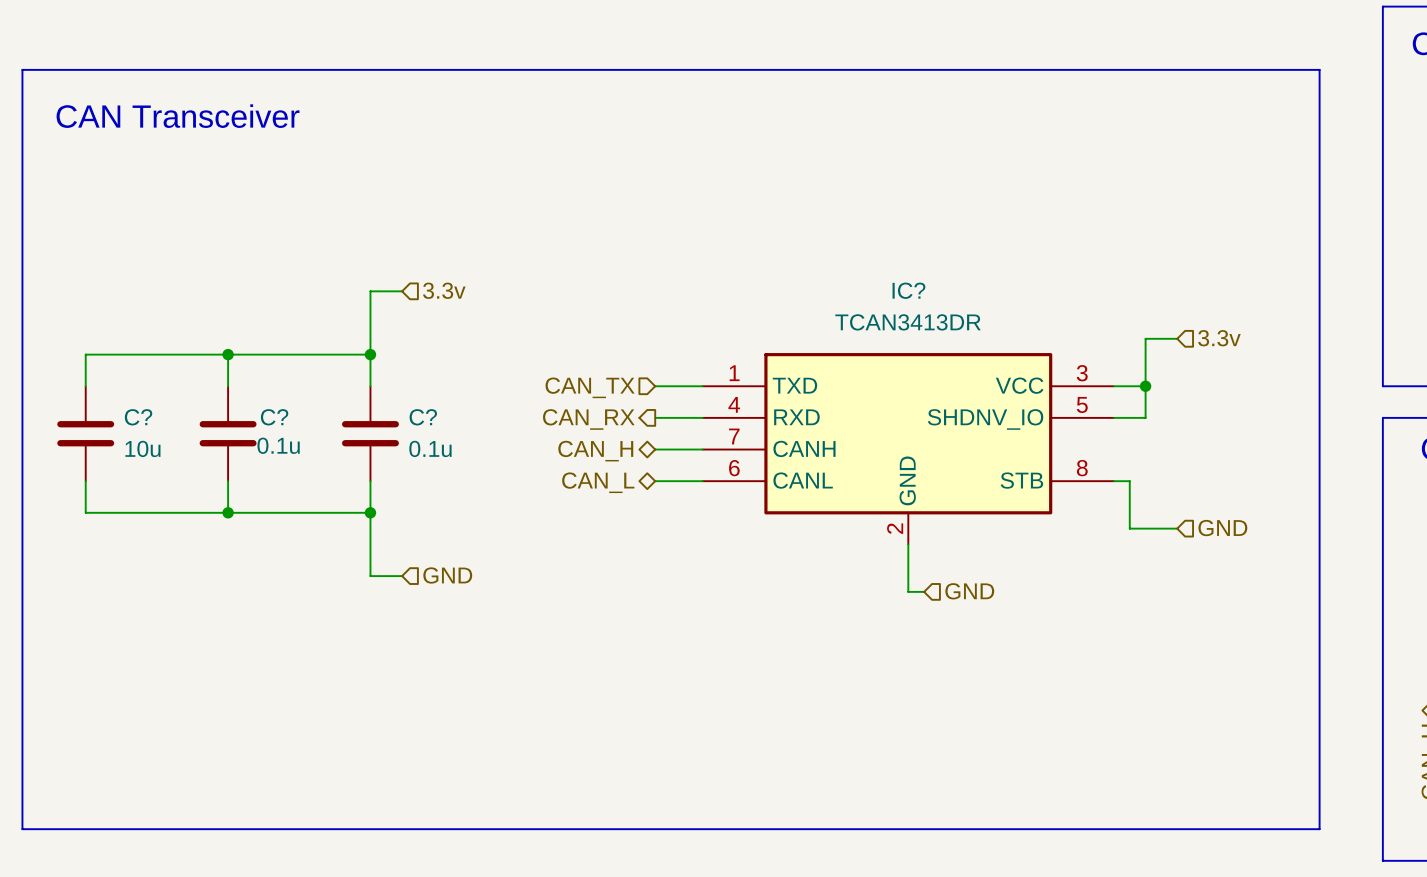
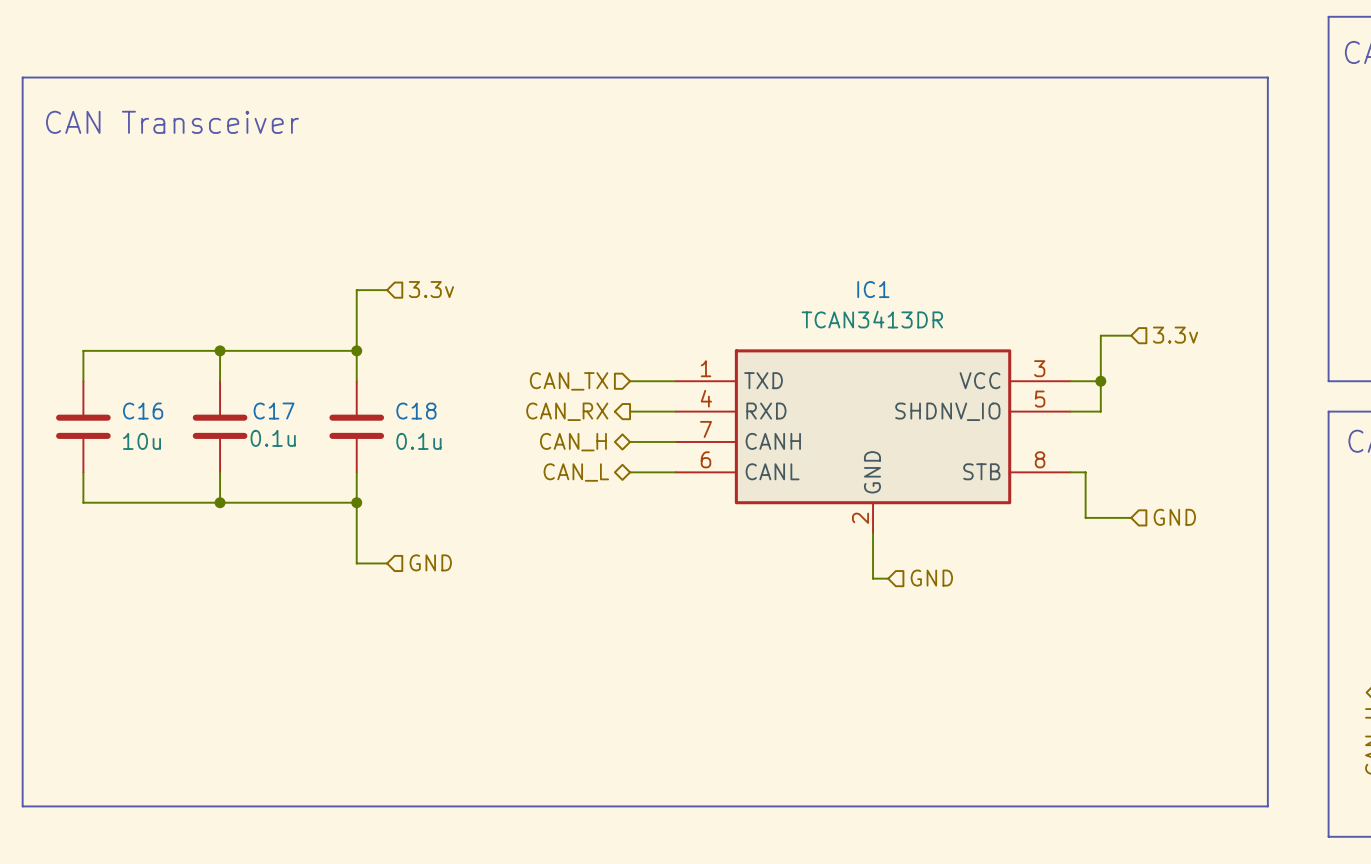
IC? name: IC? (908, 290) -> IC1 (873, 289)
C? name: C? (138, 417) -> C16 (143, 411)
C? name: C? (274, 417) -> C17 (274, 411)
C? name: C? (423, 417) -> C18 (416, 411)

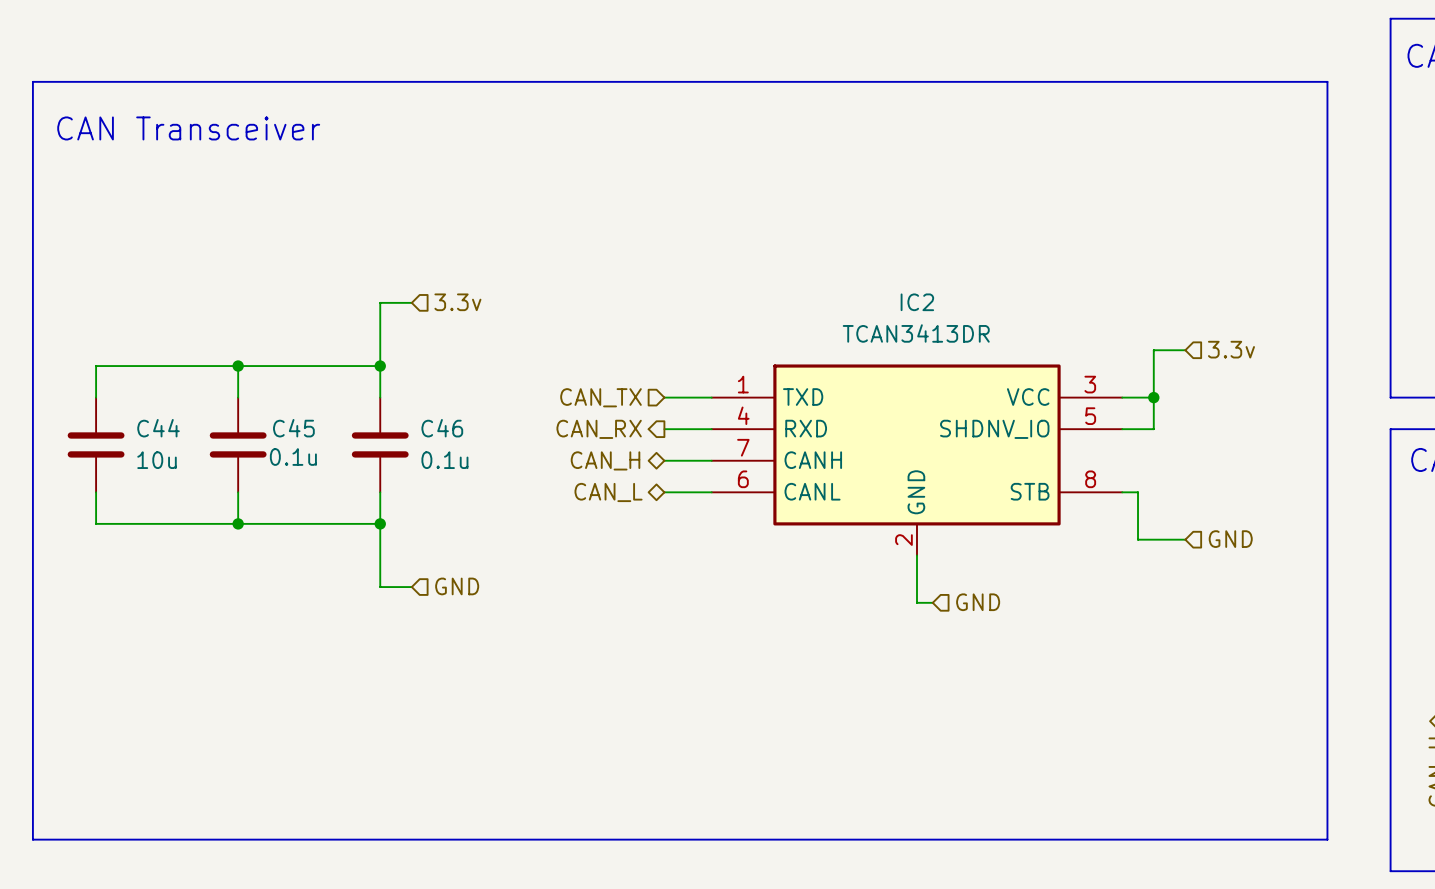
IC1 name: IC1 (873, 289) -> IC2 (917, 302)
C16 name: C16 (143, 411) -> C44 (158, 428)
C17 name: C17 (274, 411) -> C45 (293, 428)
C18 name: C18 (416, 411) -> C46 (442, 428)

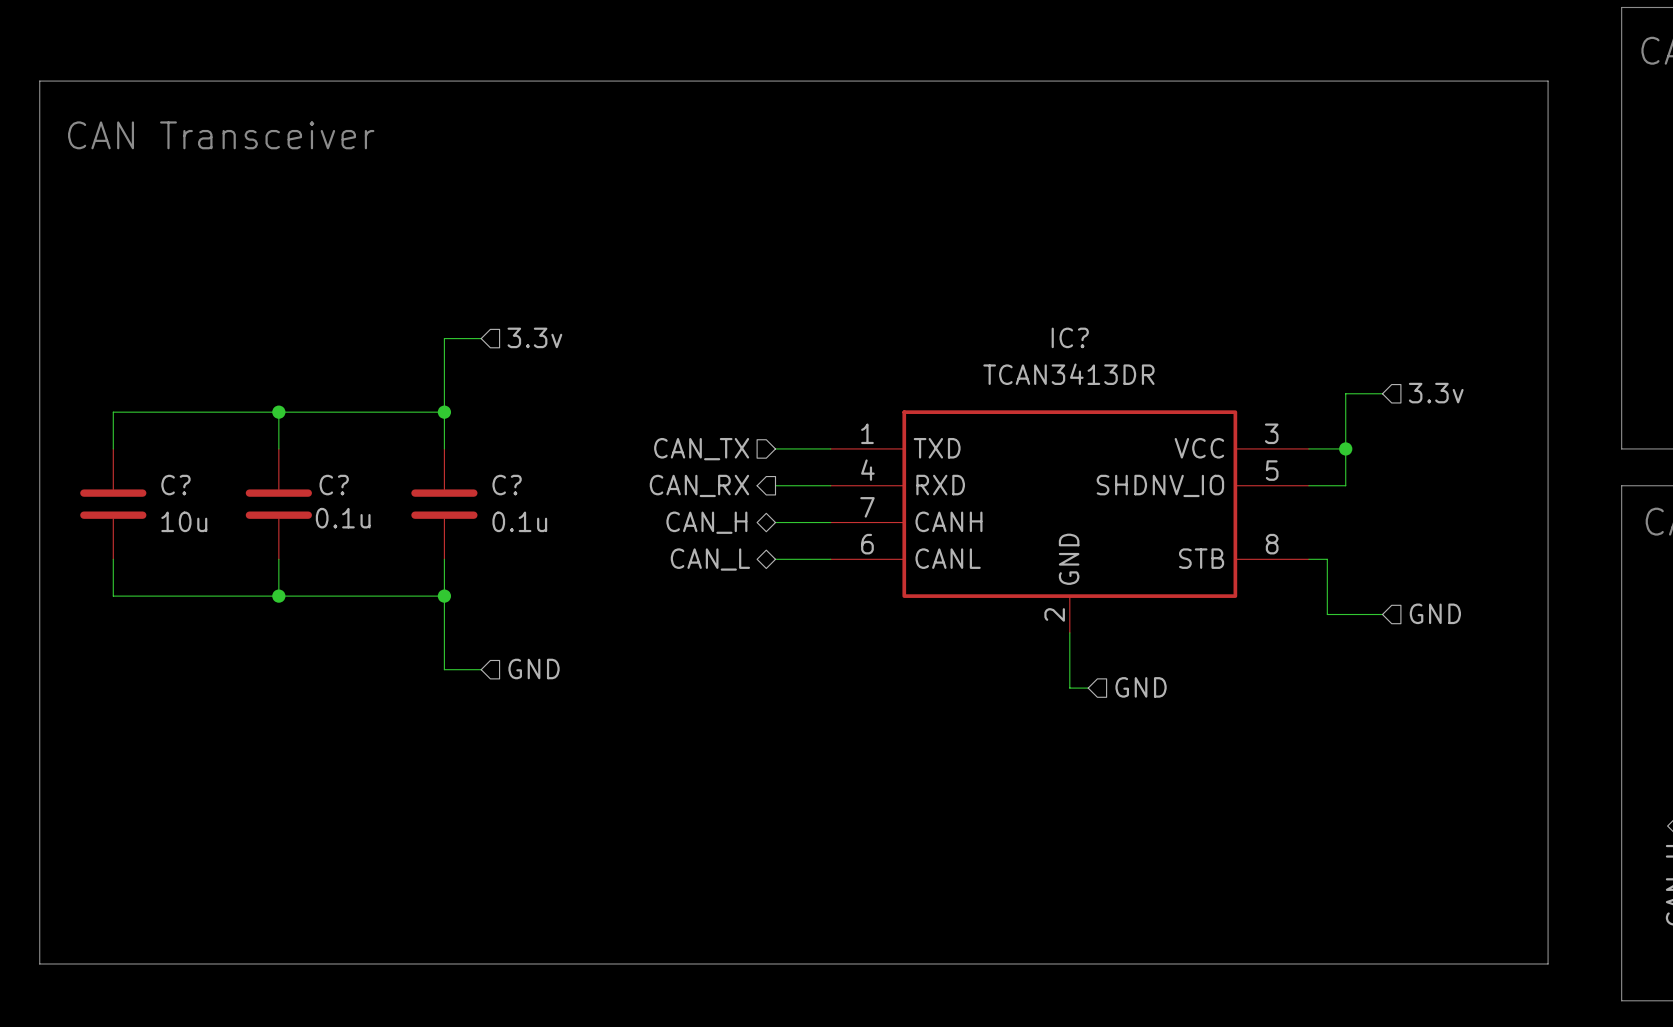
IC2 name: IC2 (917, 302) -> IC? (1070, 337)
C44 name: C44 (158, 428) -> C? (175, 485)
C45 name: C45 (293, 428) -> C? (334, 485)
C46 name: C46 (442, 428) -> C? (507, 485)

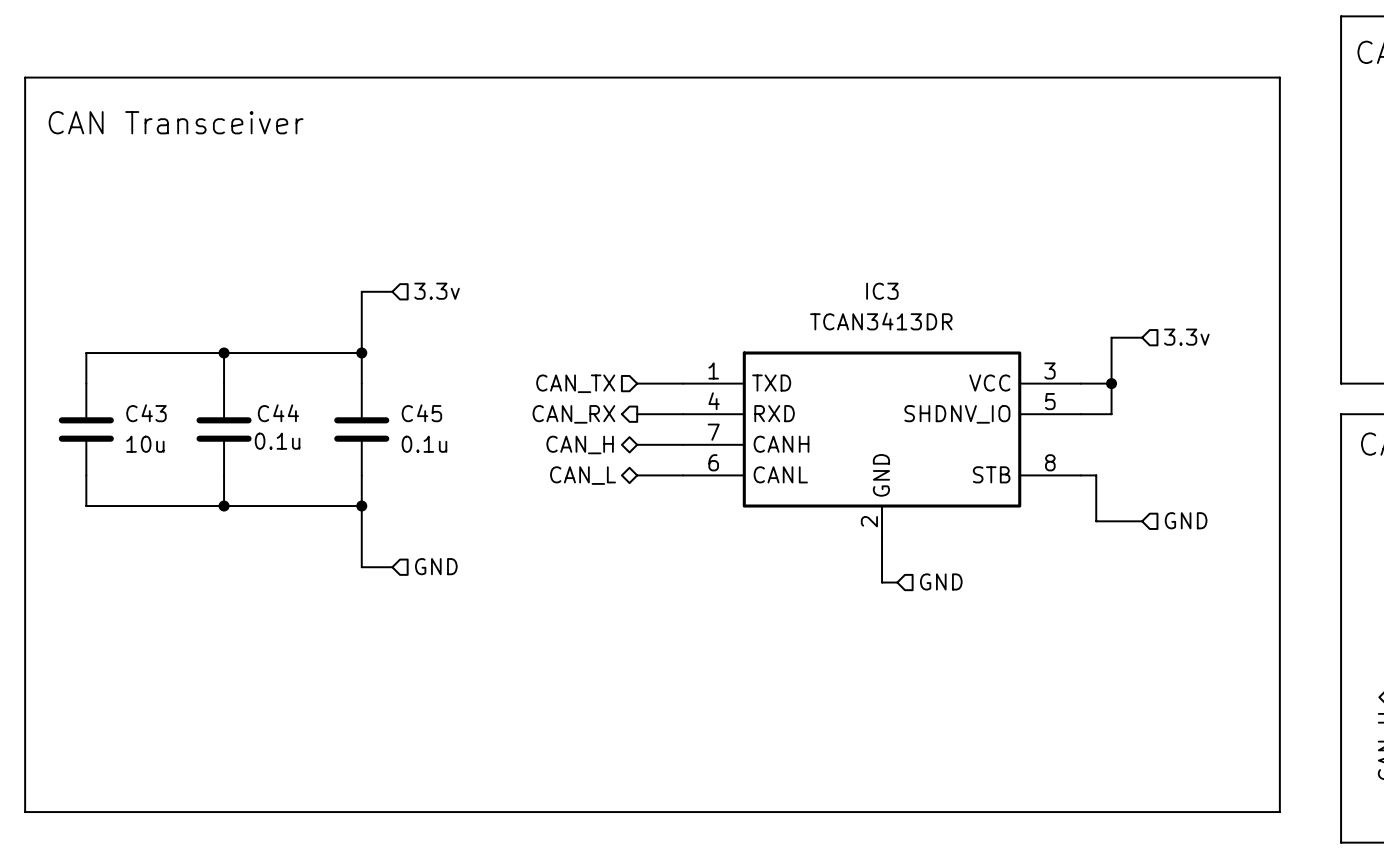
IC? name: IC? (1070, 337) -> IC3 (882, 291)
C? name: C? (175, 485) -> C43 (146, 413)
C? name: C? (334, 485) -> C44 (278, 413)
C? name: C? (507, 485) -> C45 (421, 413)

